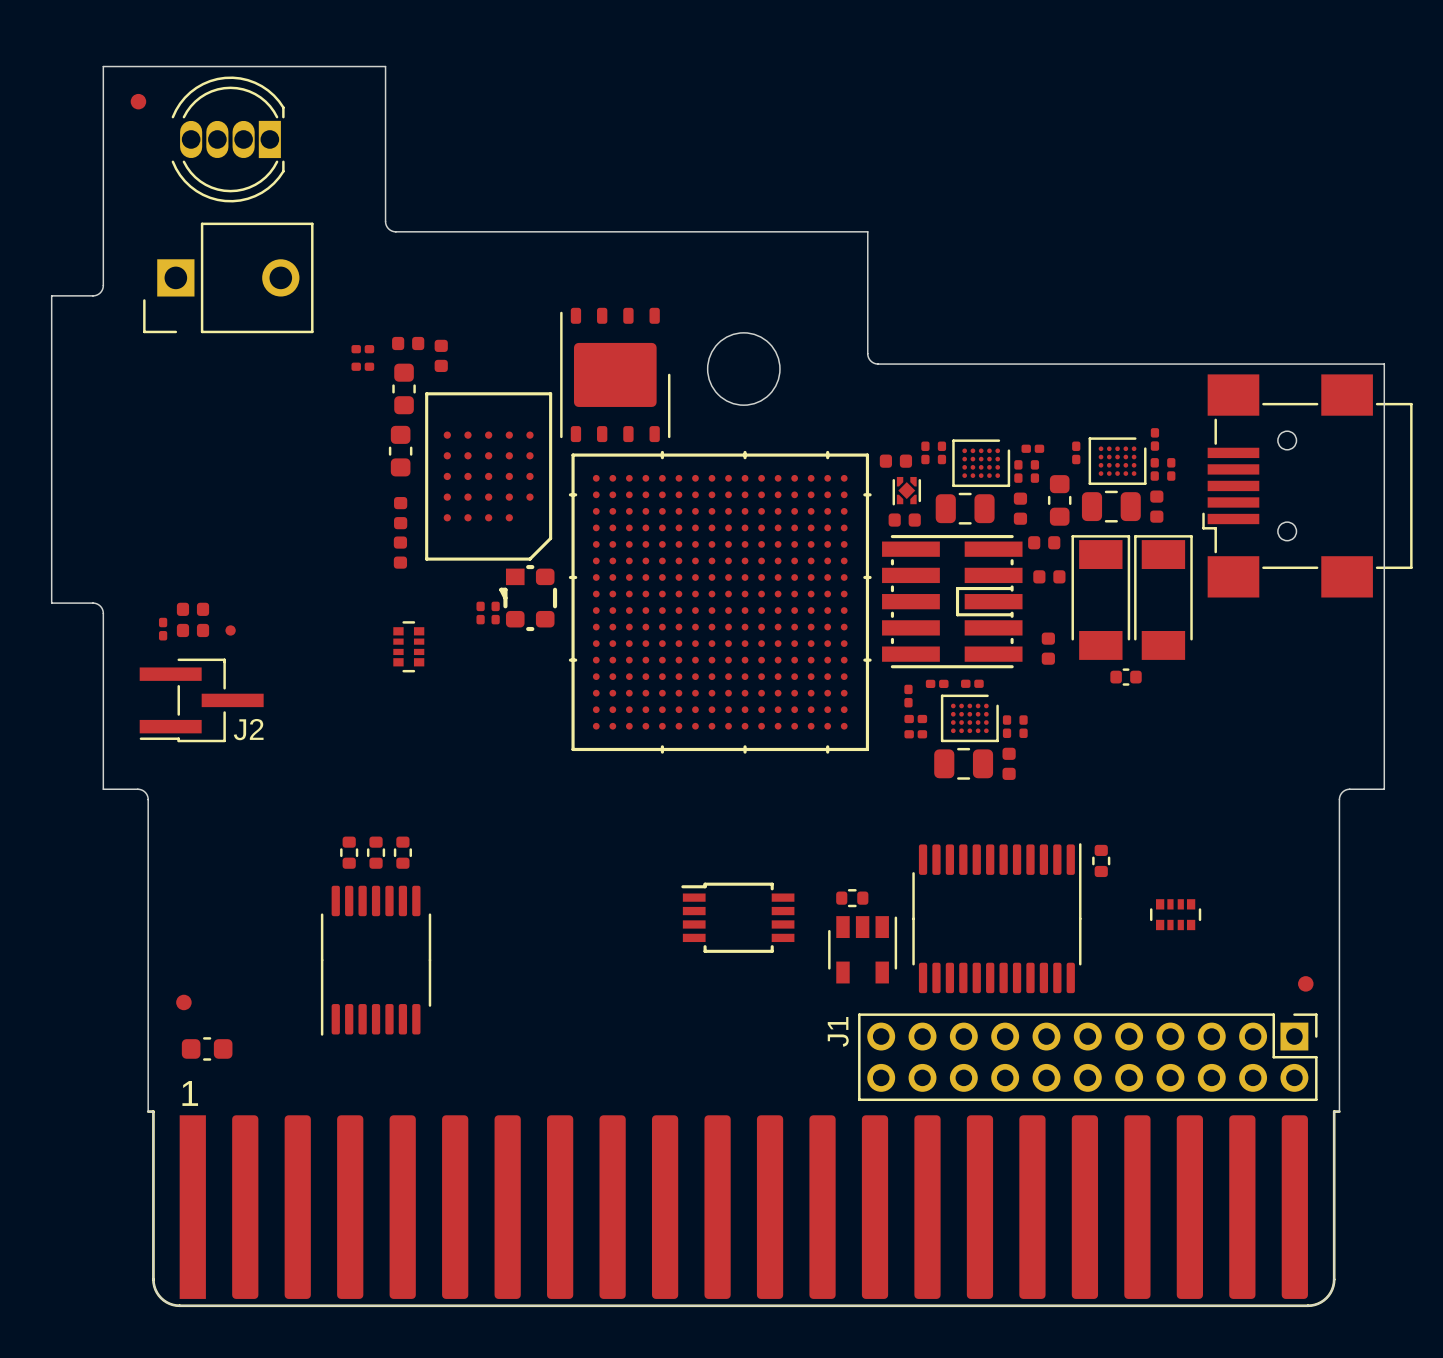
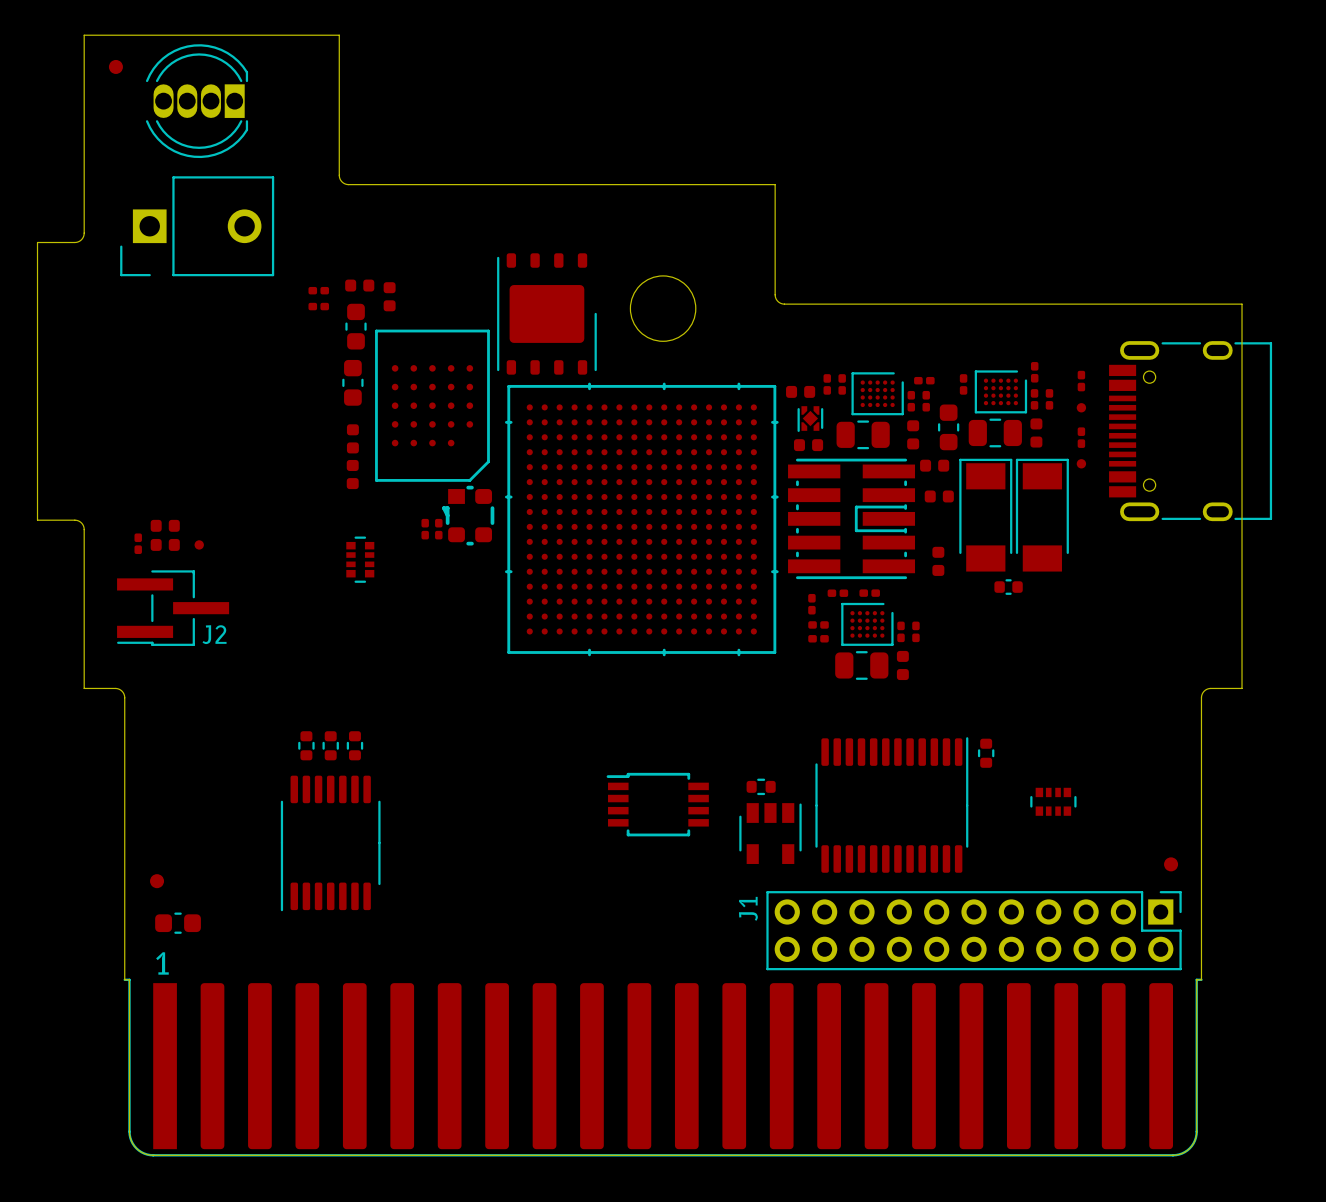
part: none -> (1081, 381)
part: none -> (1081, 407)
part: (1307, 485) -> none
part: none -> (1190, 431)
part: none -> (1081, 437)
part: none -> (1081, 463)

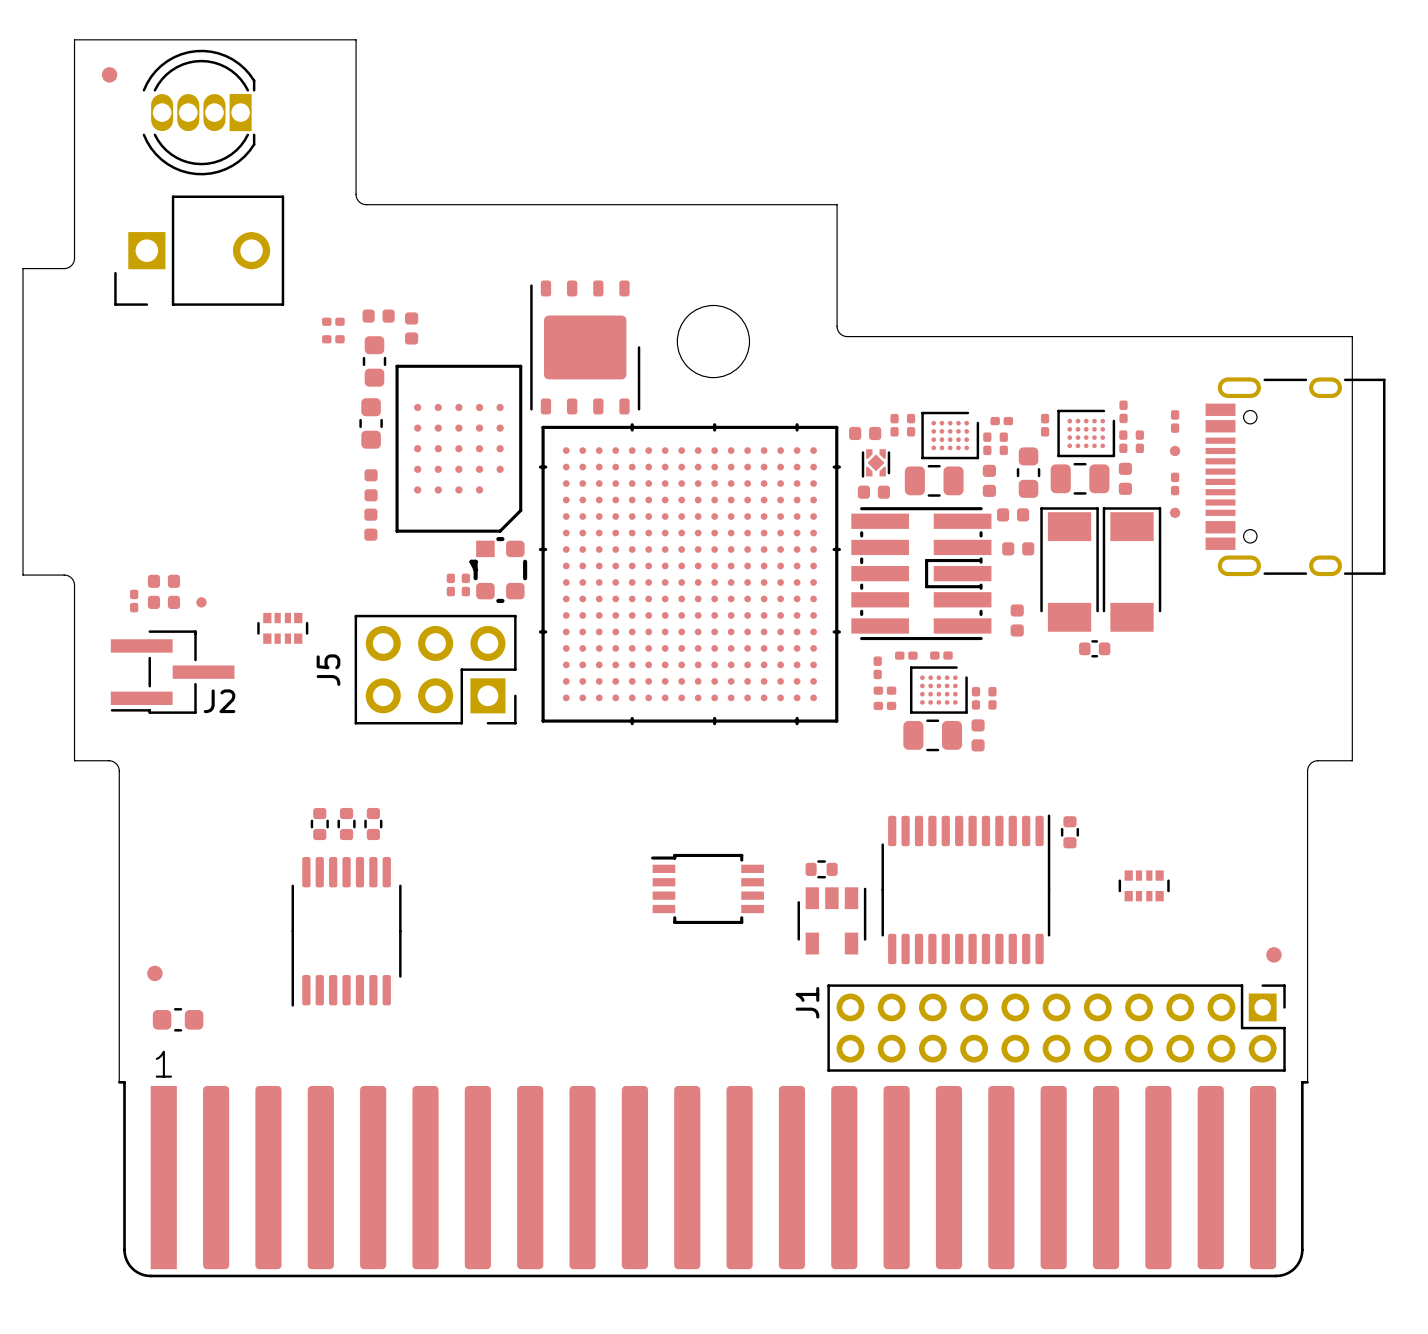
part rotation: 0° (360, 559) -> 90° clockwise (282, 628)
part position: (360, 559) -> (282, 628)
J5: none -> (435, 669)

